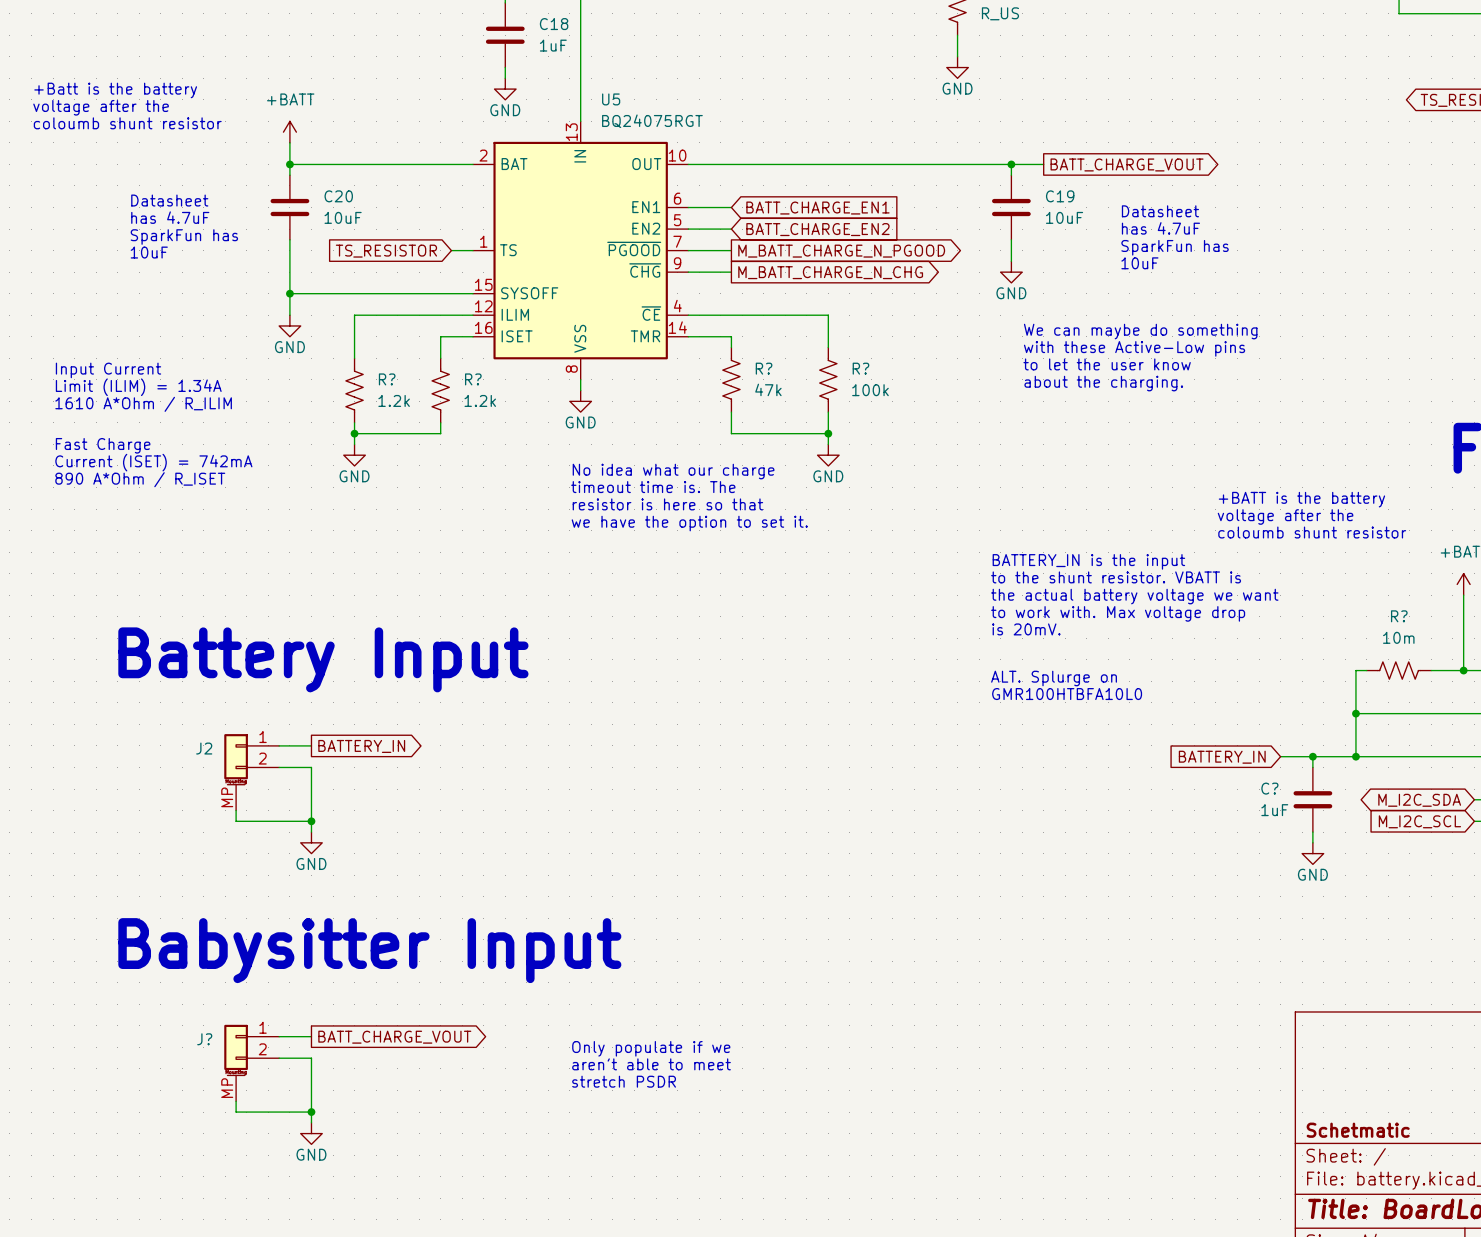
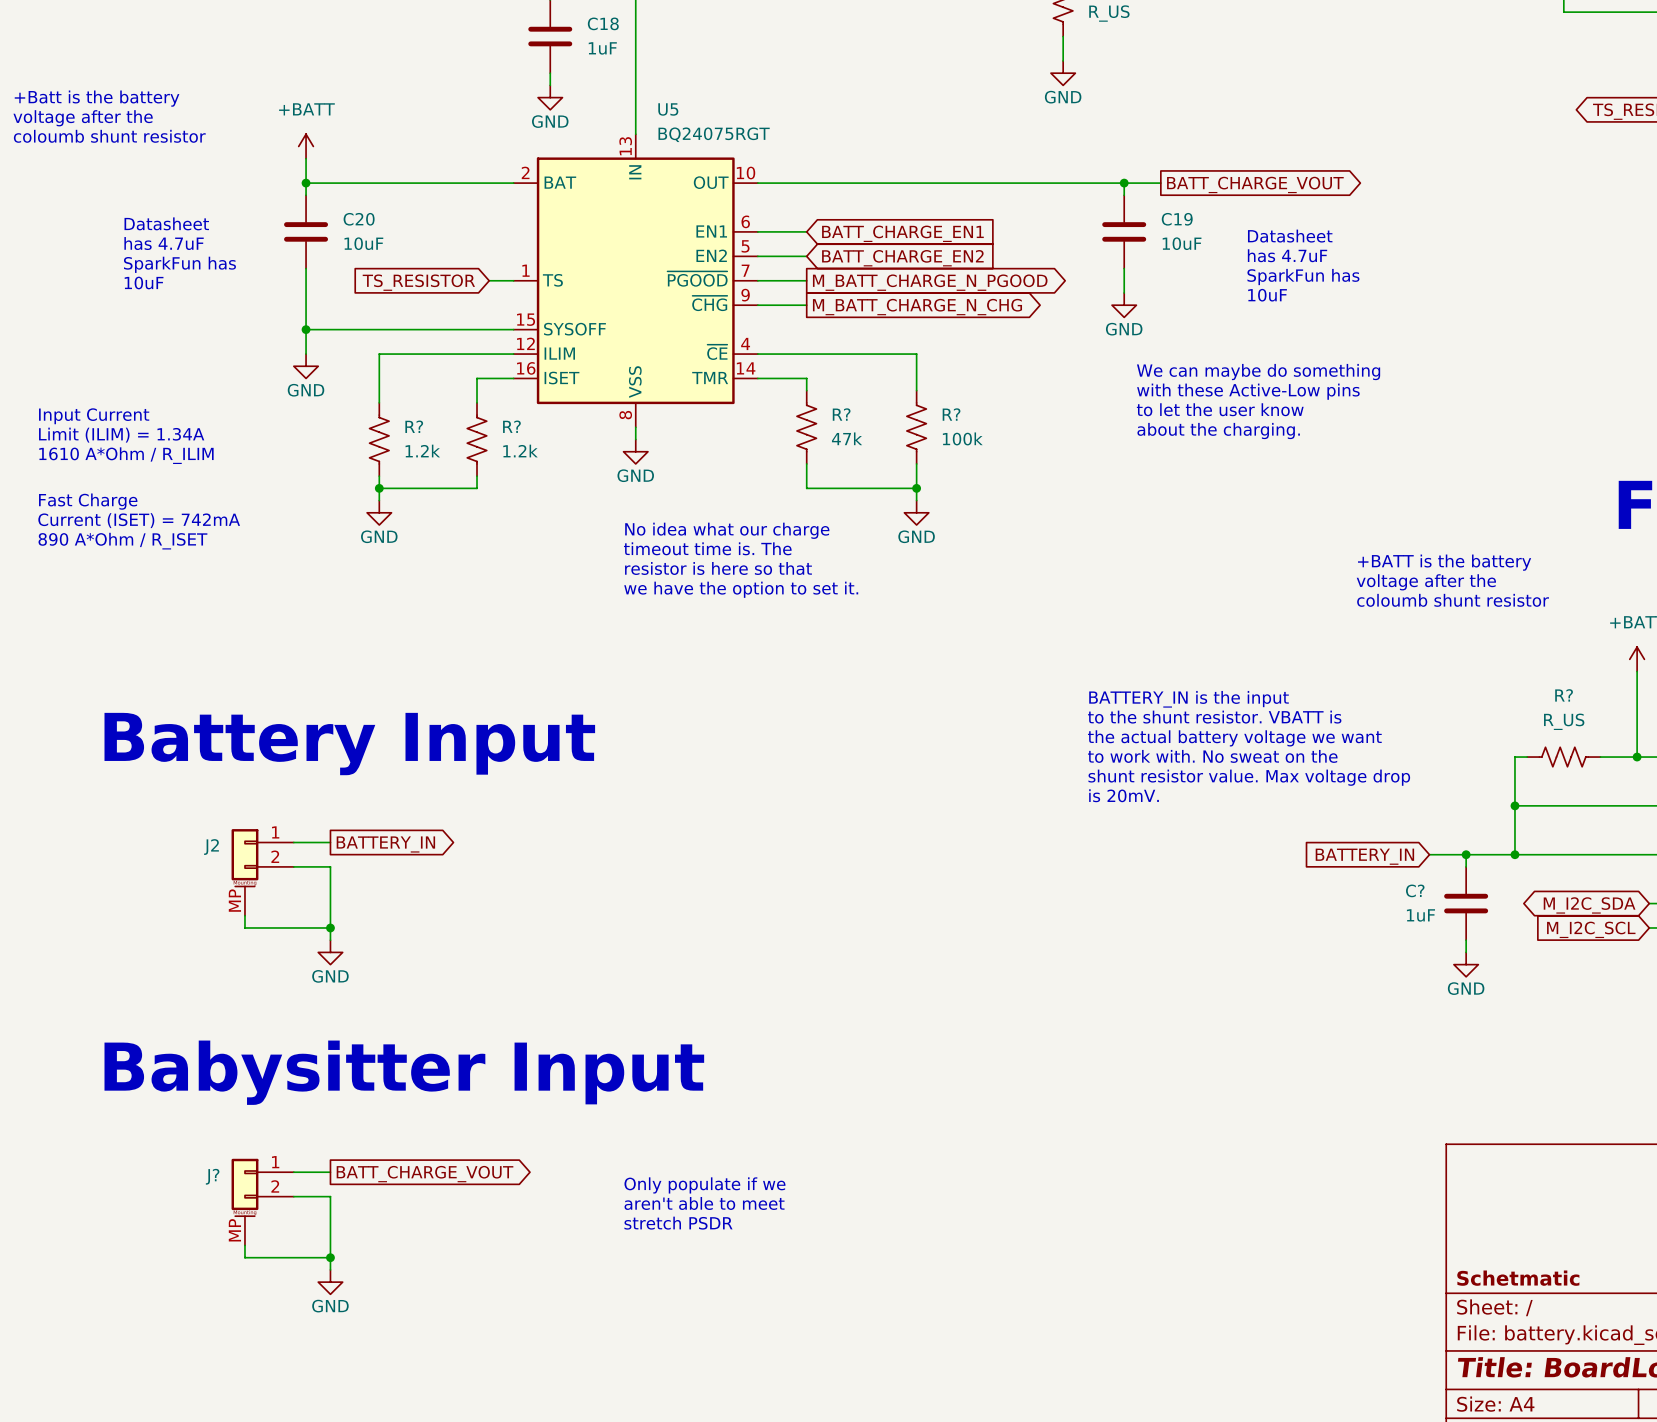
text position: BATTERY_IN is the input (1088, 561) -> BATTERY_IN is the input (1189, 699)
text position: to the shunt resistor. VBATT is (1116, 577) -> to the shunt resistor. VBATT is (1214, 717)
text position: the actual battery voltage we want (1134, 596) -> the actual battery voltage we want (1234, 738)
text: to work with. Max voltage drop (1118, 613) -> none
text position: is 20mV. (1026, 629) -> is 20mV. (1124, 795)
R? value: 10m (1398, 637) -> R_US (1564, 721)
text: none -> to work with. No sweat on the (1212, 756)
text: ALT. Splurge on (1054, 678) -> none
text: none -> shunt resistor value. Max voltage drop (1249, 777)
text: GMR100HTBFA10L0 (1067, 694) -> none

